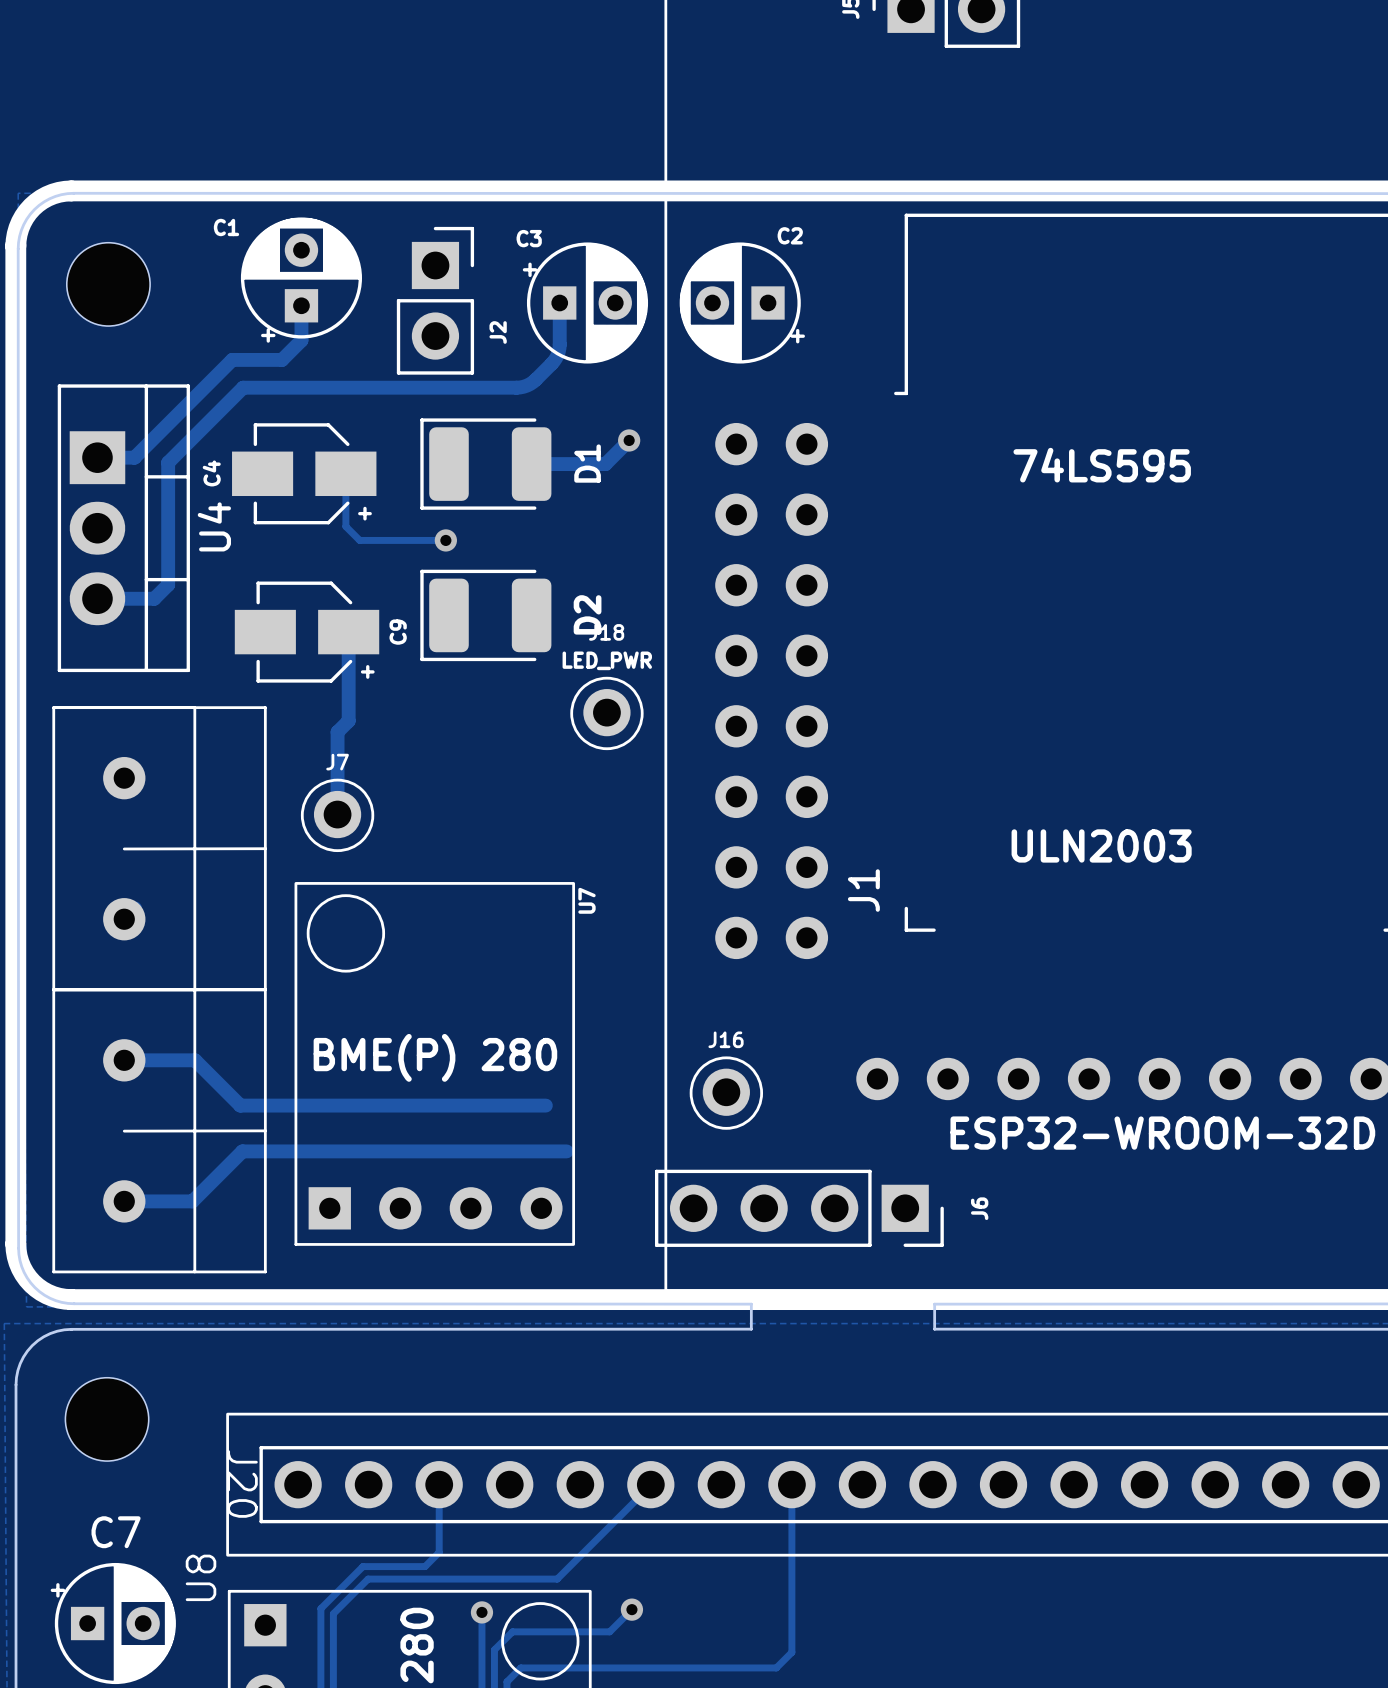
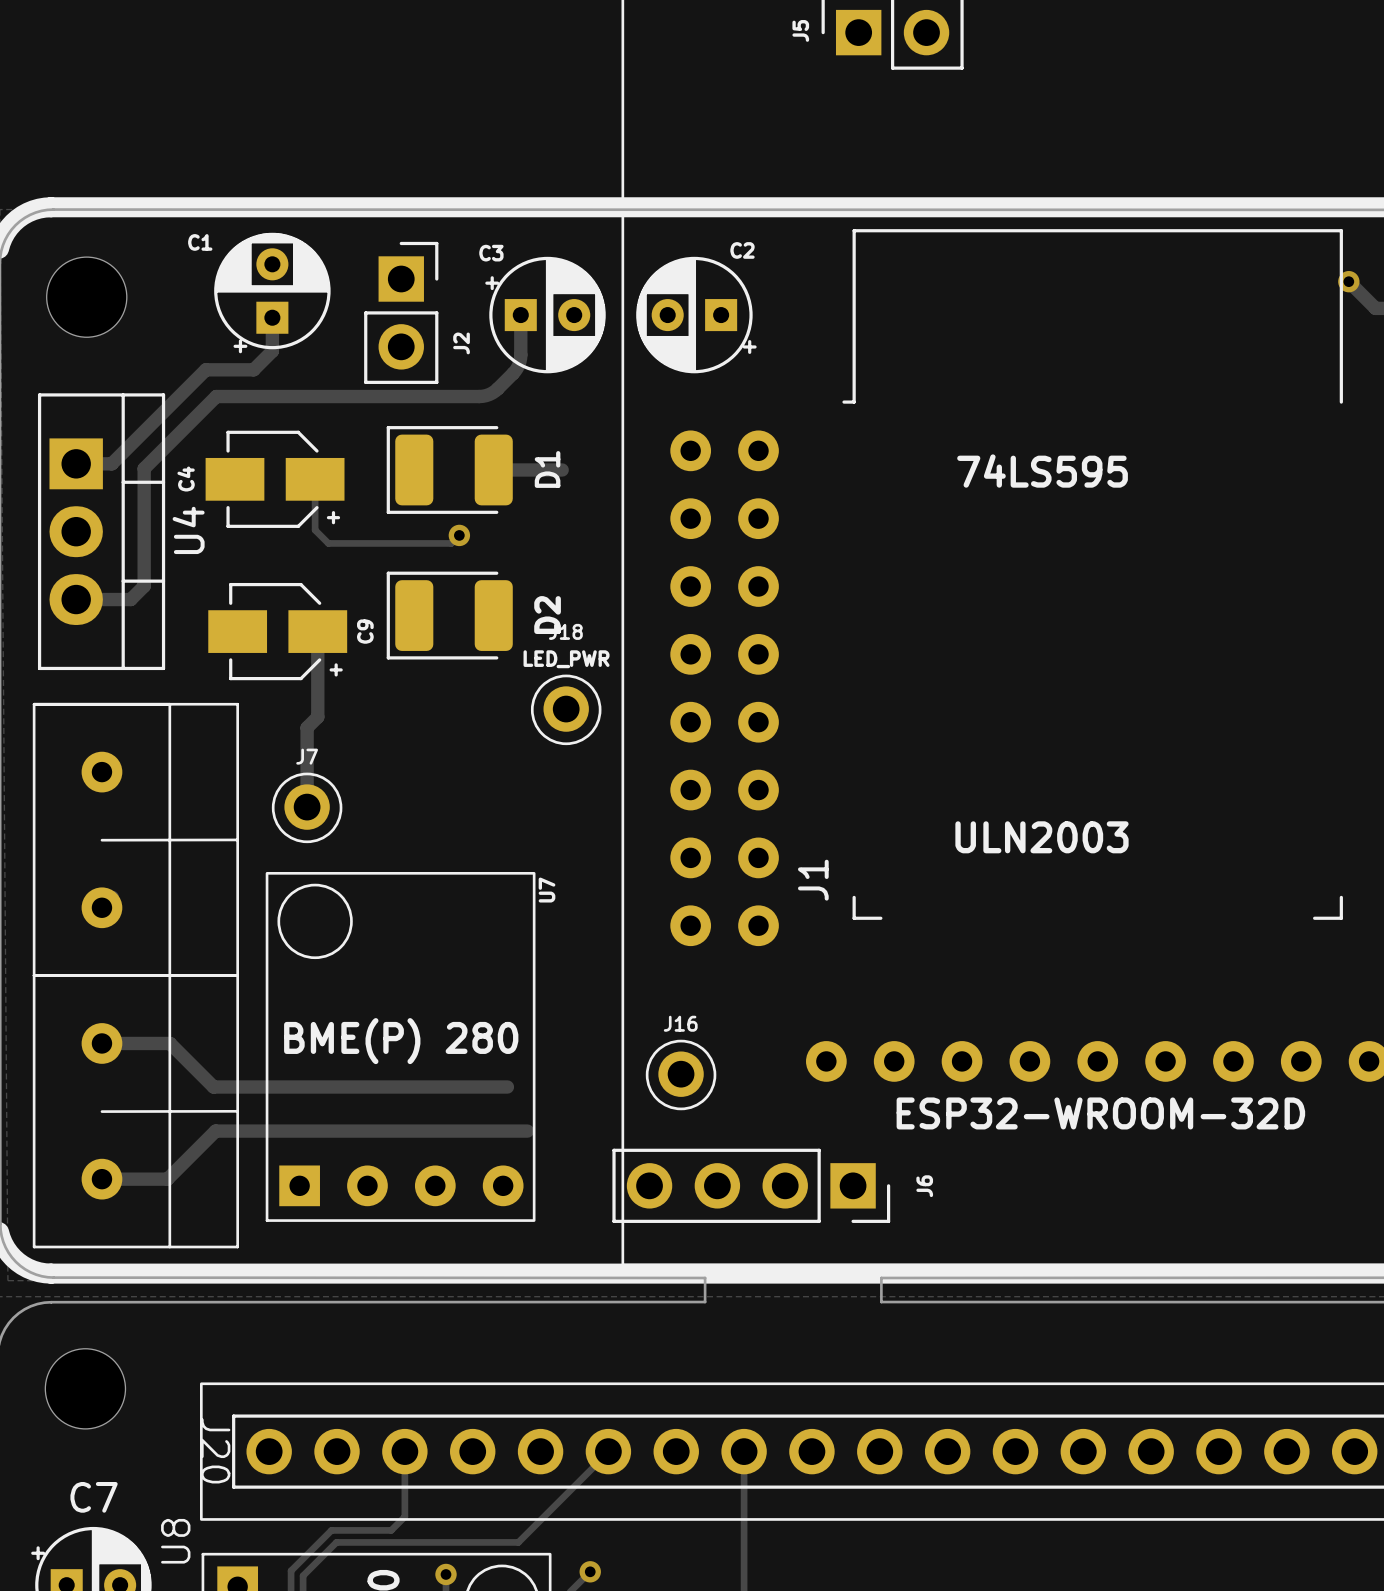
track: (629, 440) (605, 464) (602, 464) -> none
via: (629, 440) -> none
track: none -> (459, 535) (451, 543) (411, 543)
via position: (445, 540) -> (459, 535)

